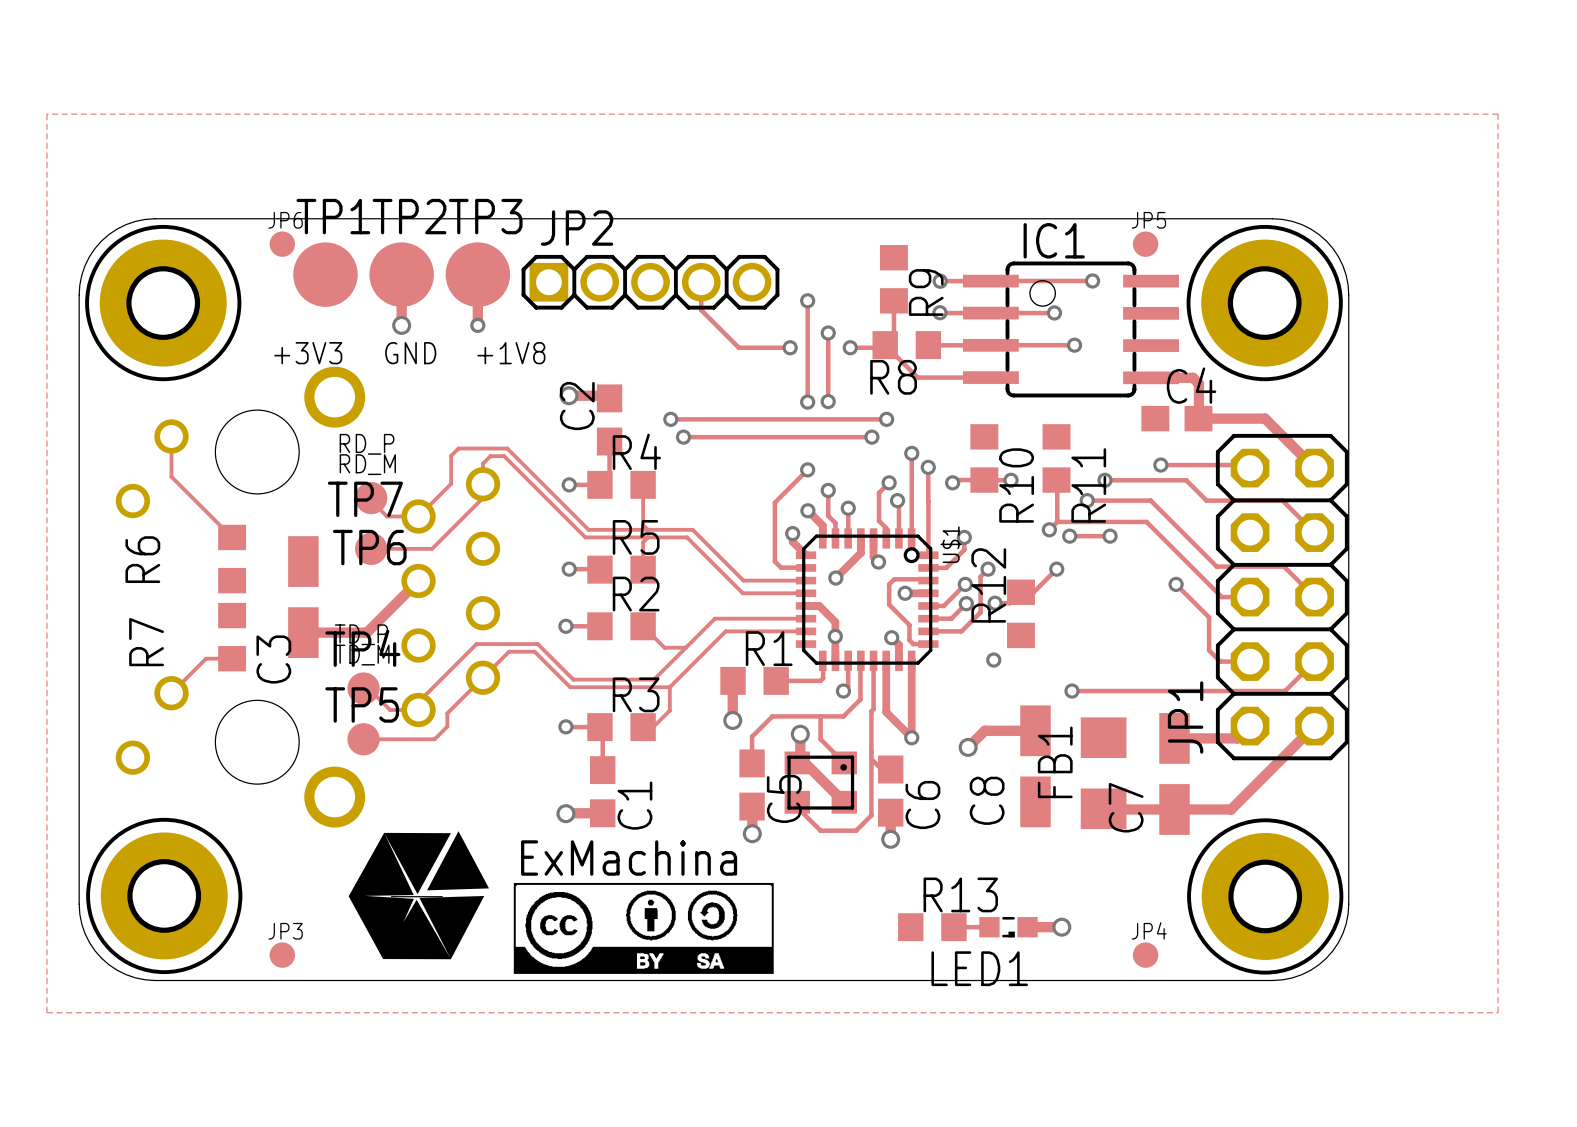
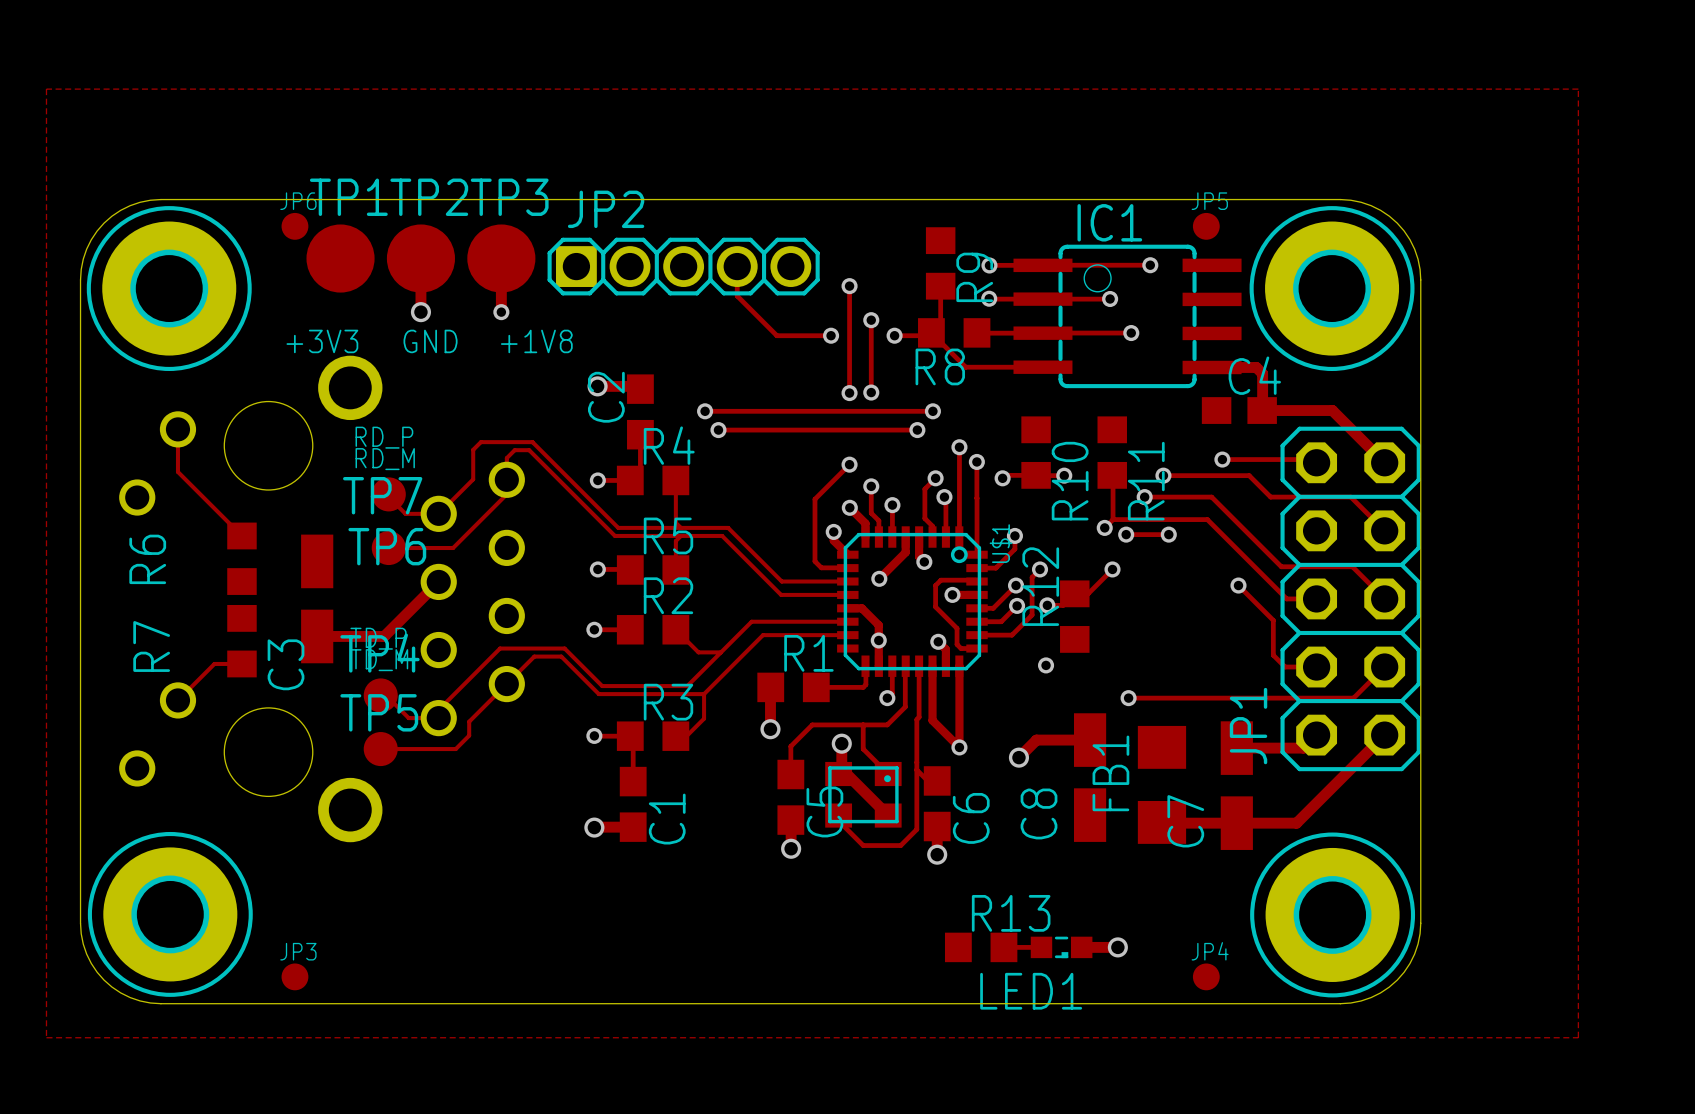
drawing: [348, 831, 774, 974] -> none

